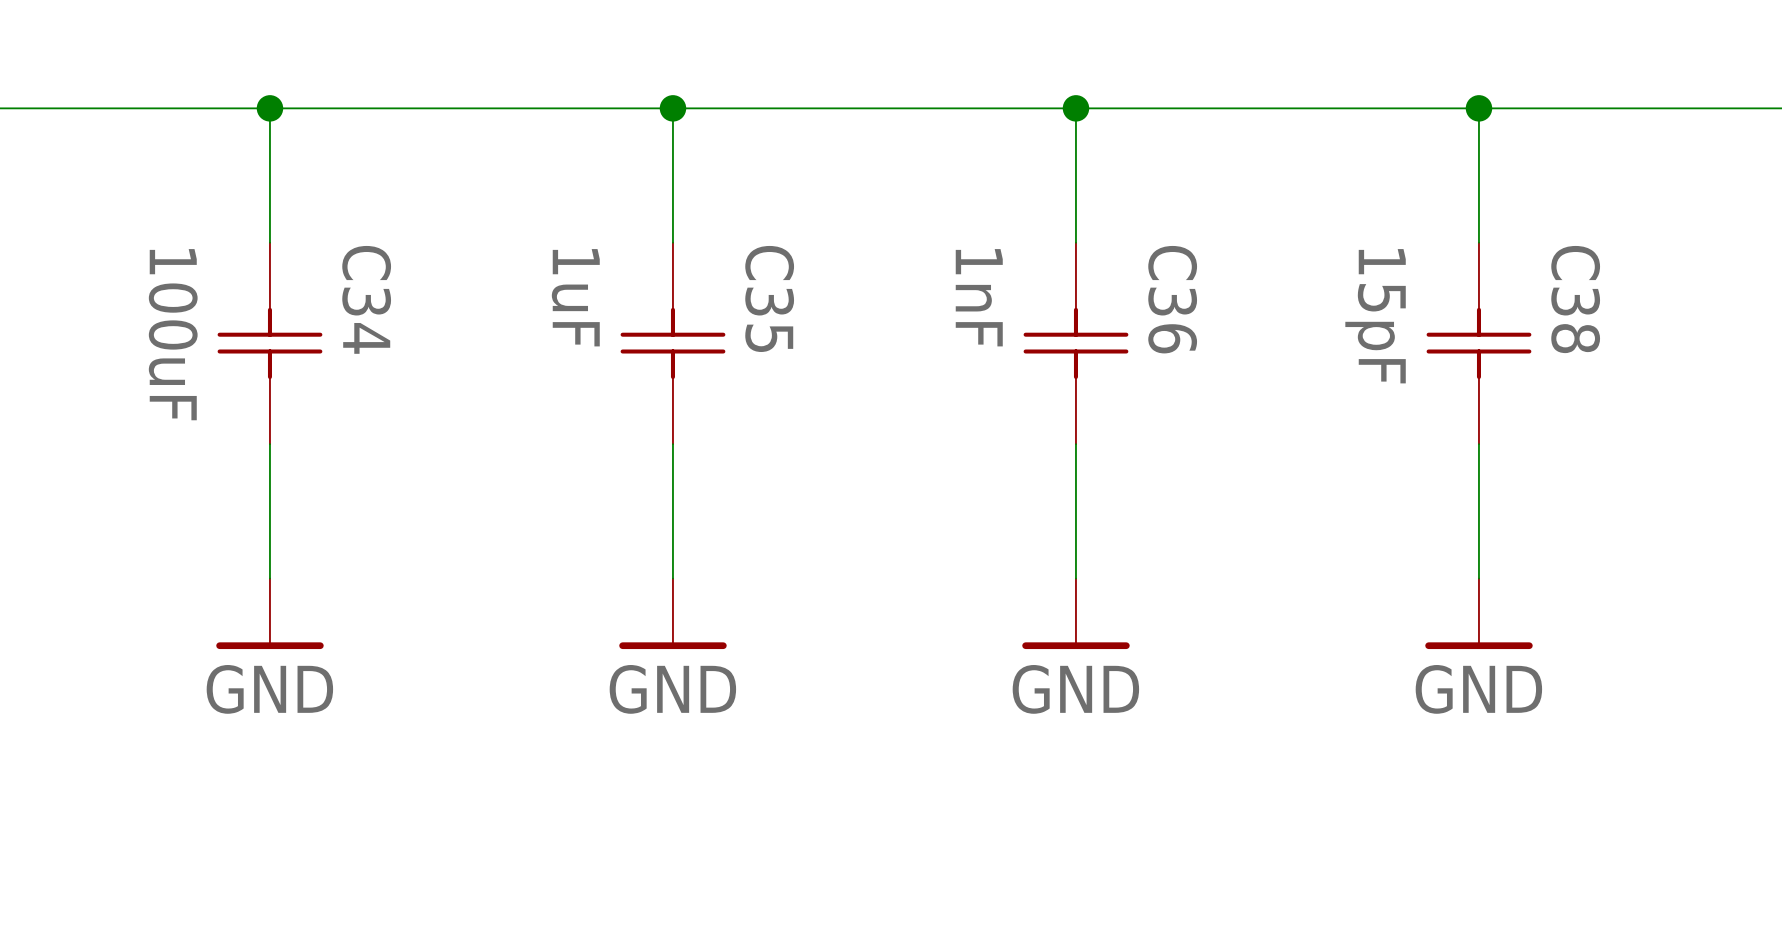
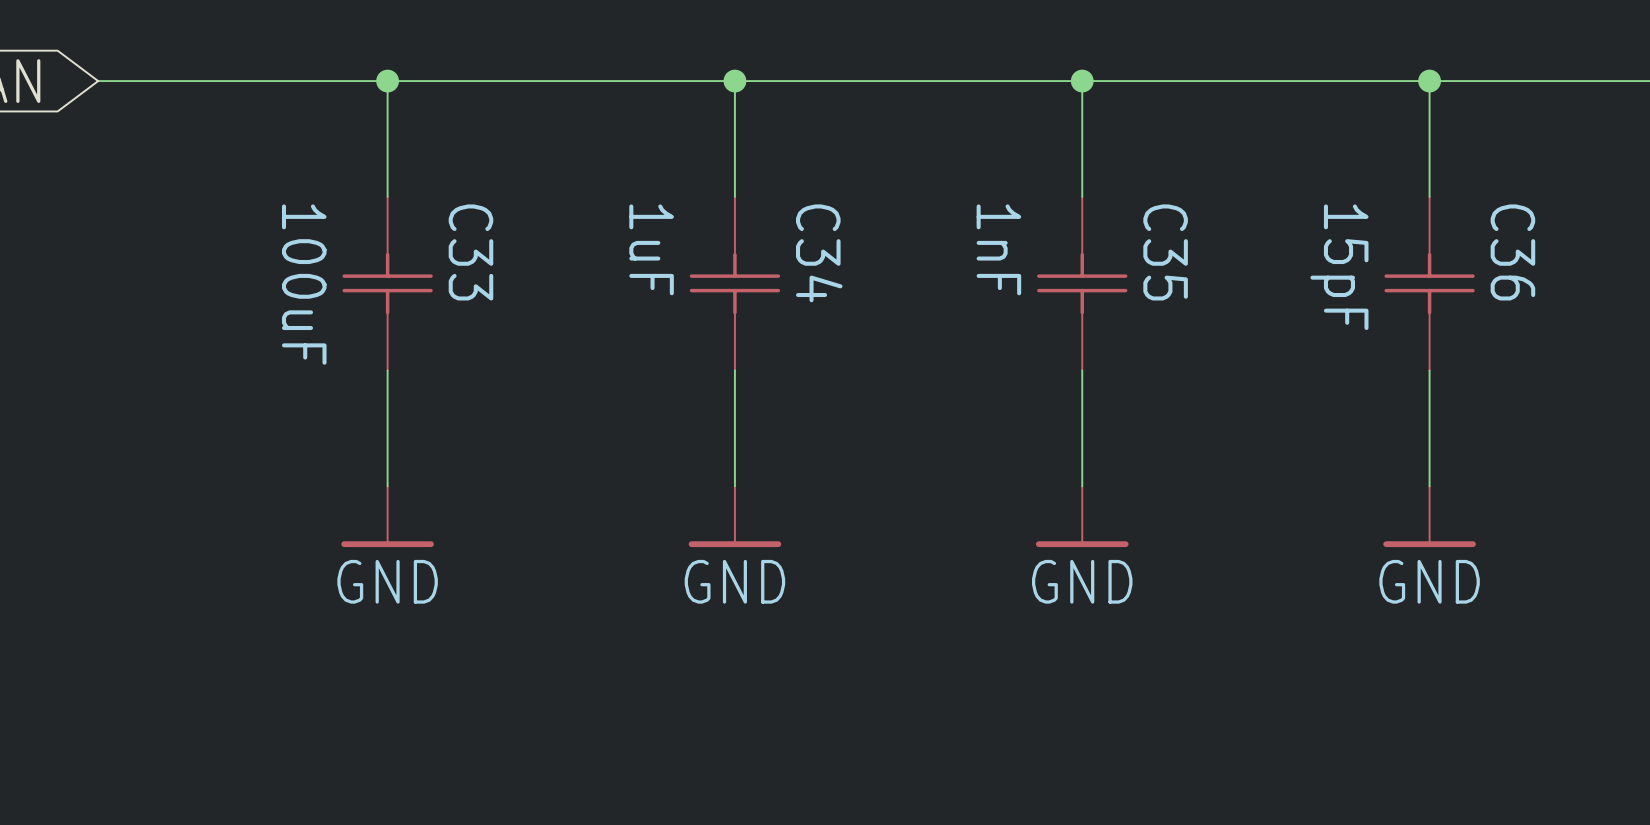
C35 name: C35 (769, 298) -> C34 (819, 253)
C34 name: C34 (366, 299) -> C33 (470, 252)
C36 name: C36 (1172, 299) -> C35 (1165, 252)
C38 name: C38 (1575, 299) -> C36 (1512, 252)

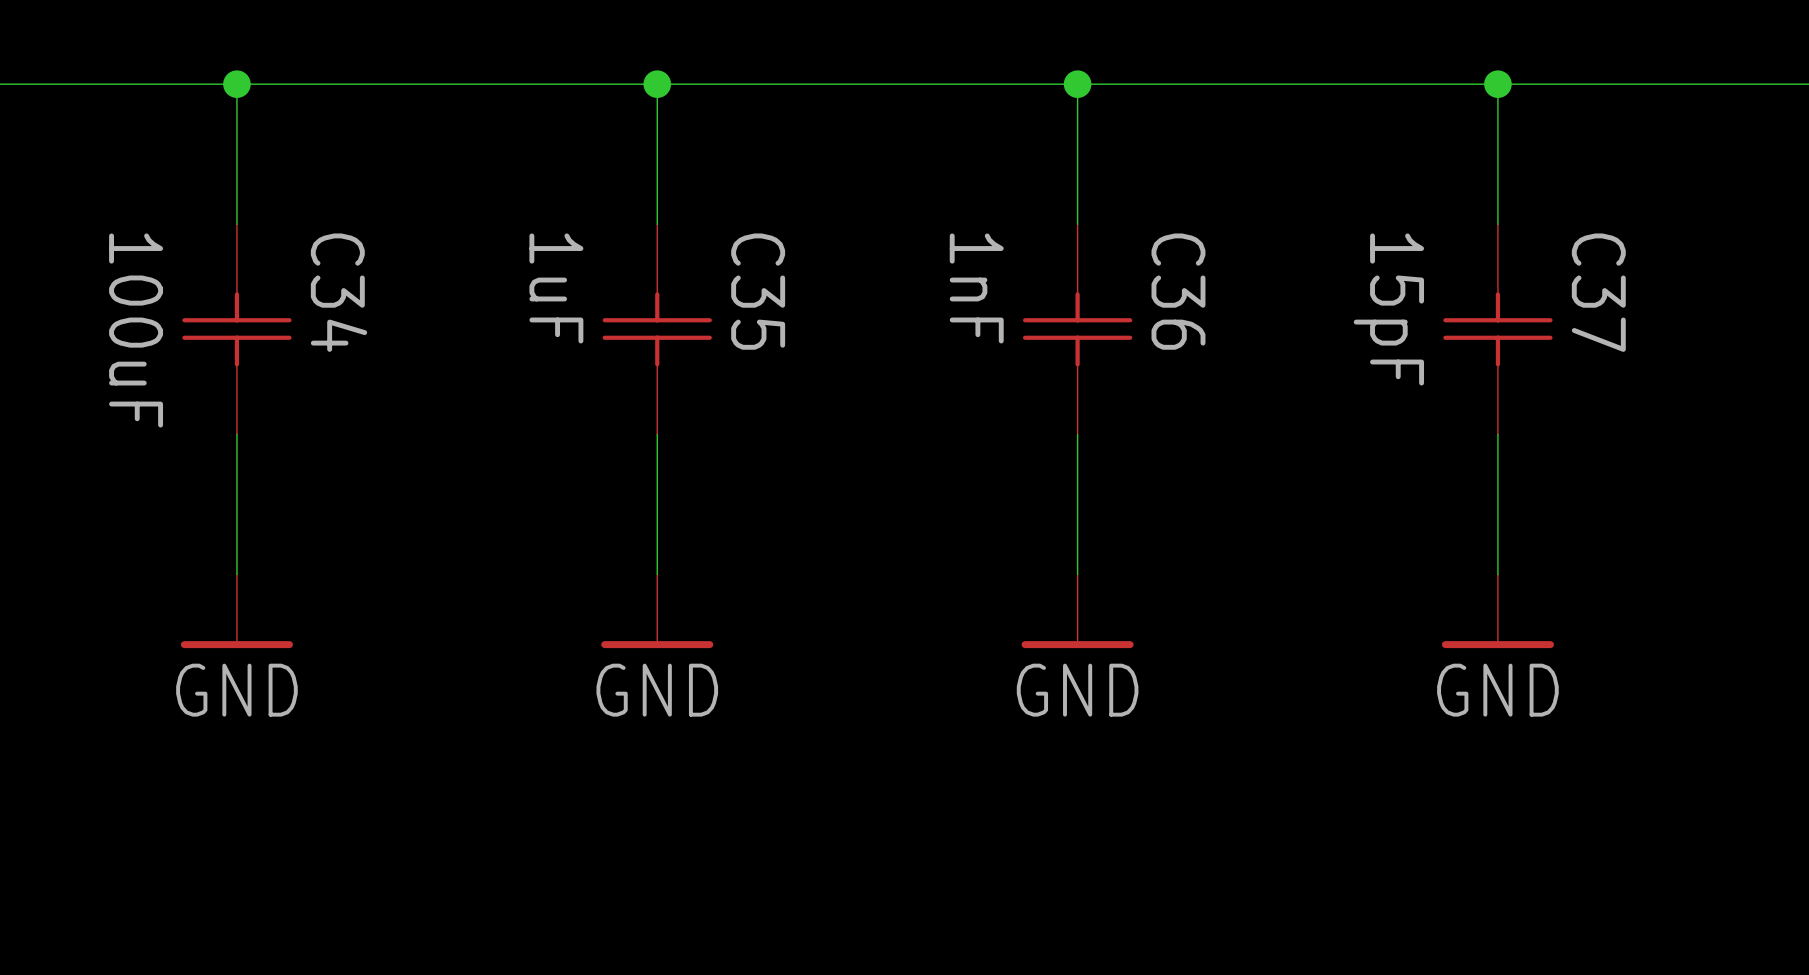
C33 name: C33 (470, 252) -> C34 (338, 292)
C35 name: C35 (1165, 252) -> C36 (1178, 291)
C36 name: C36 (1512, 252) -> C37 (1598, 292)
C34 name: C34 (819, 253) -> C35 (758, 291)

